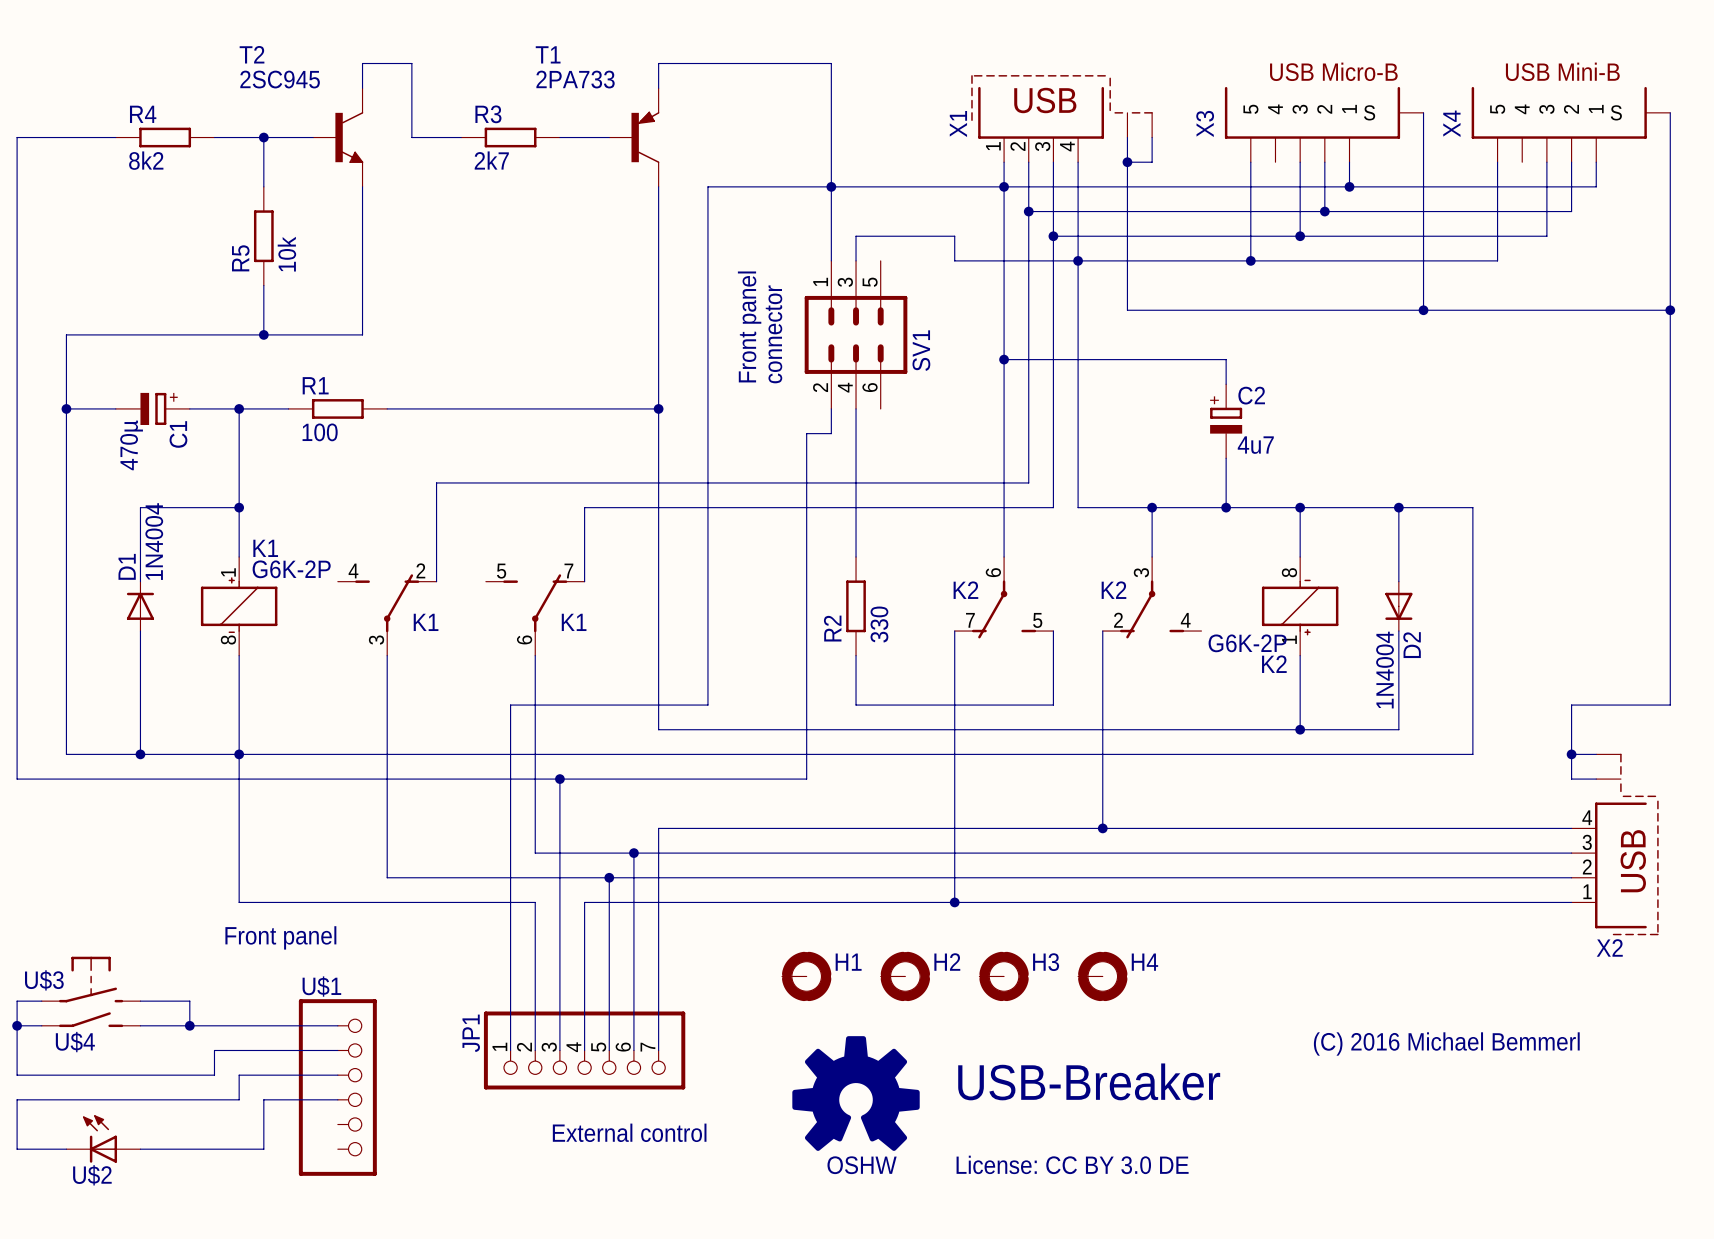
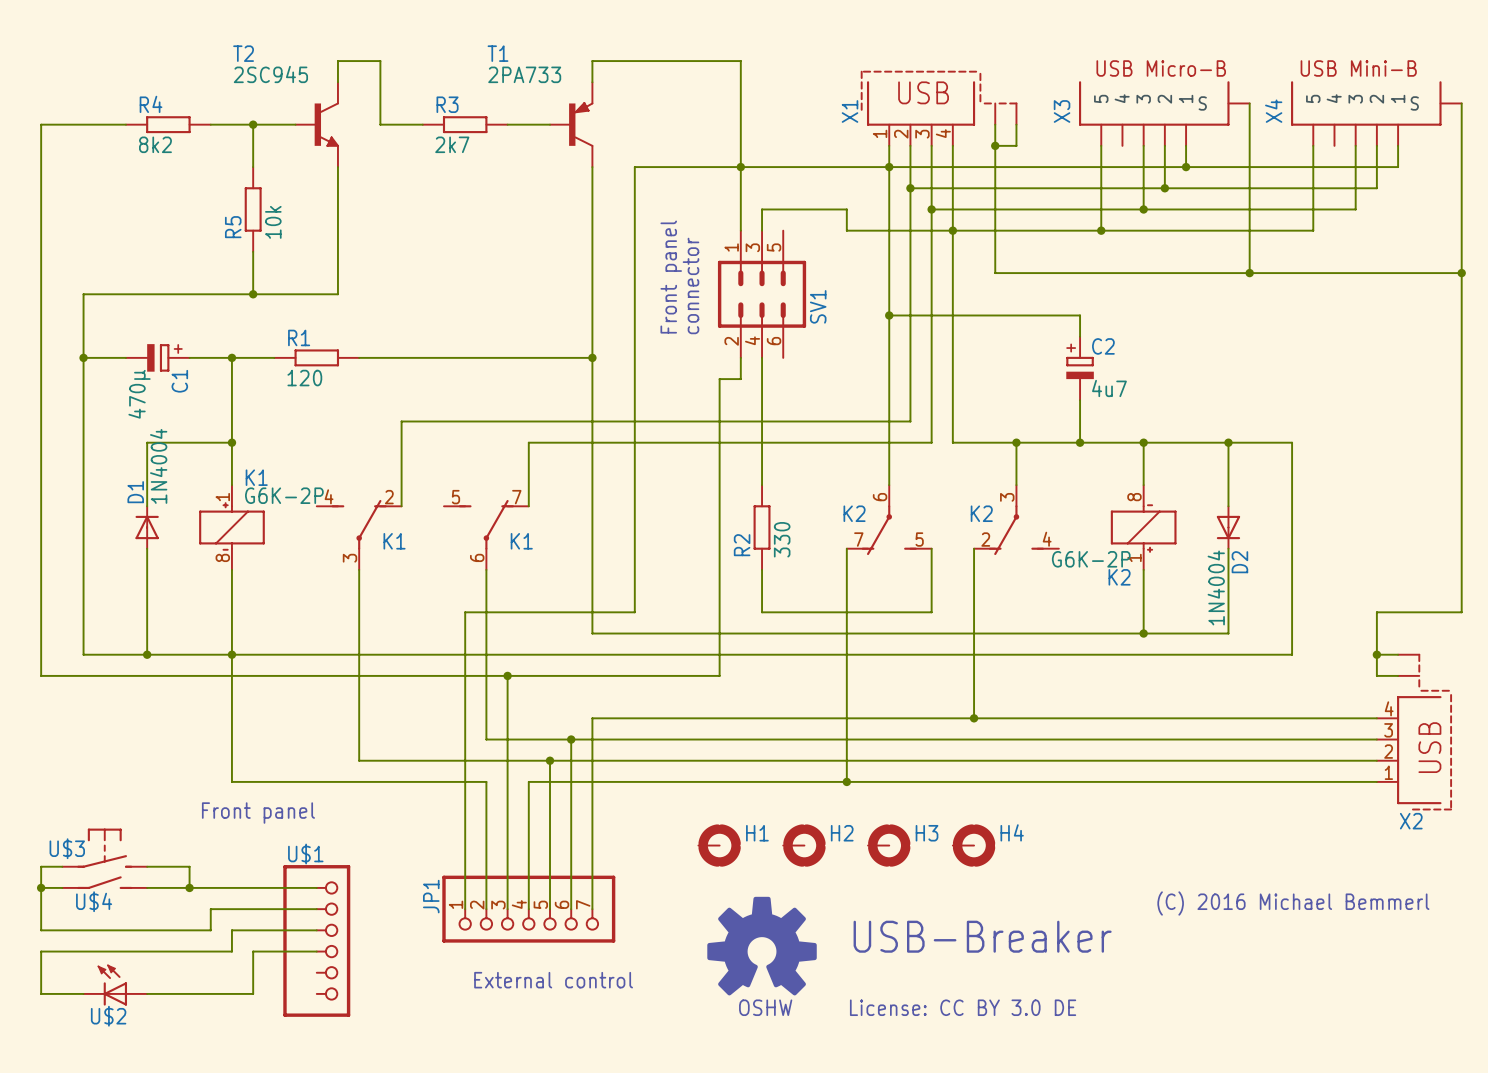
R1 value: 100 (320, 432) -> 120 (304, 378)

